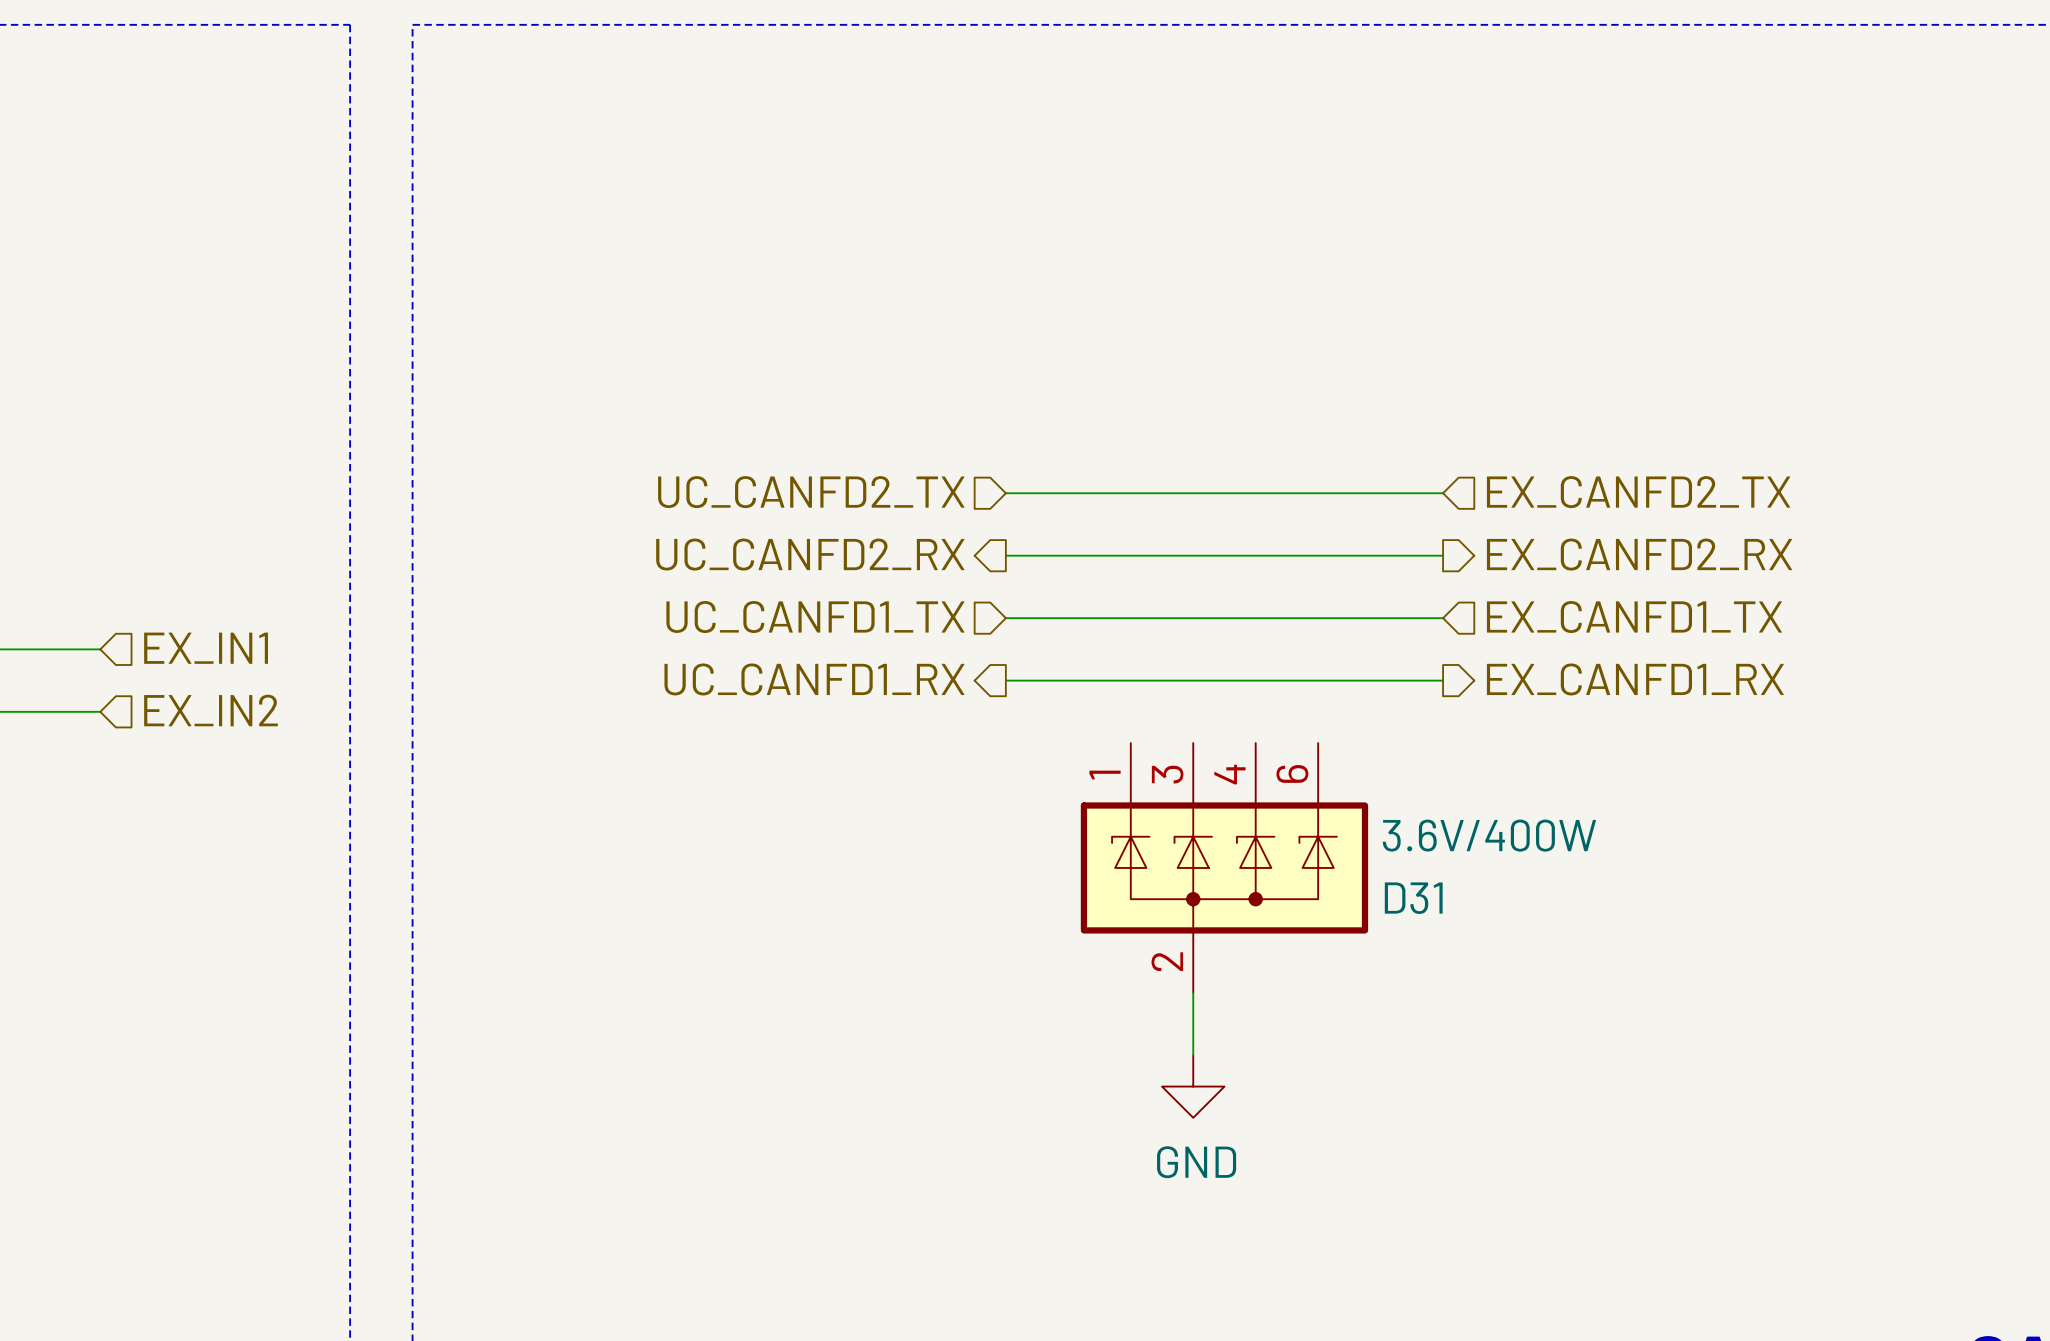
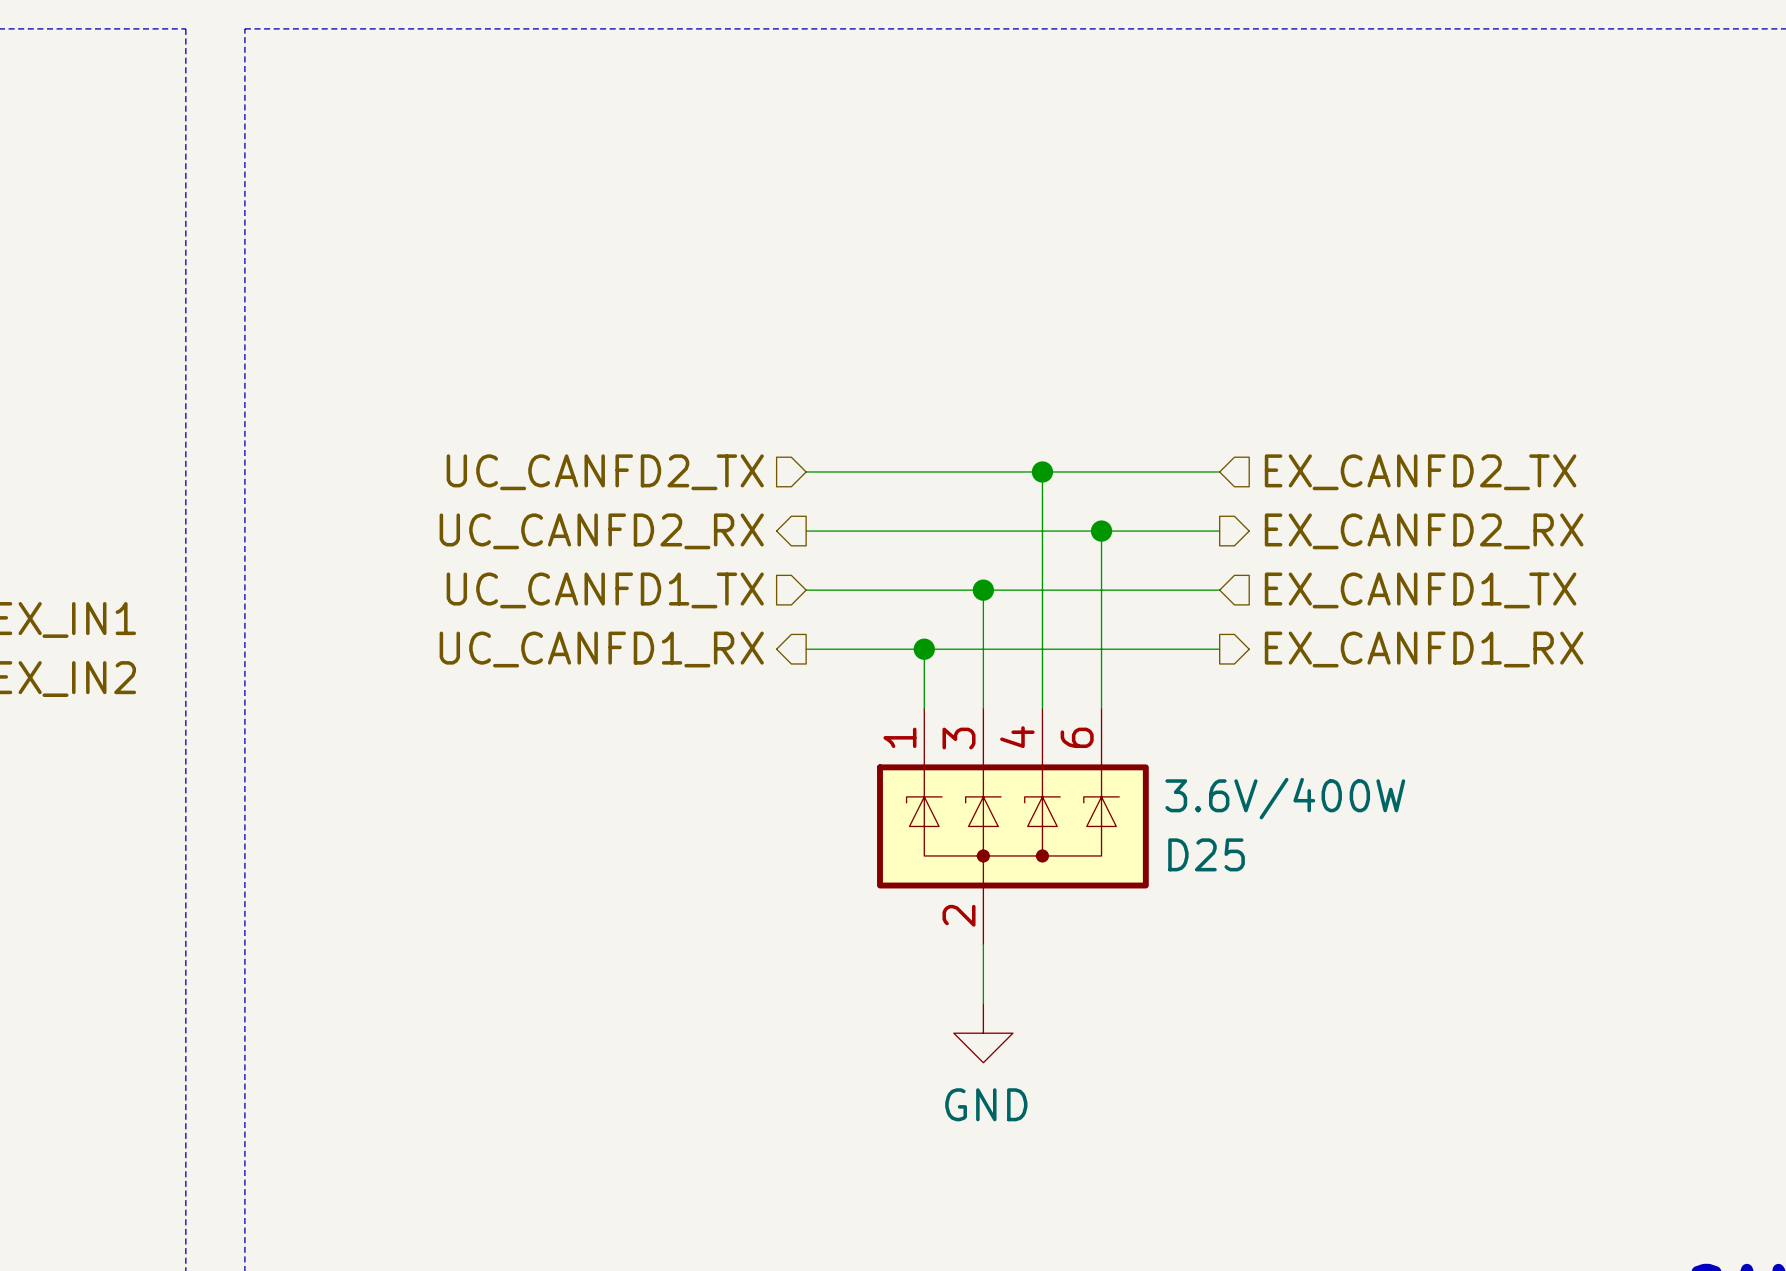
wire: none -> (1042, 471) (1042, 708)
junction: none -> (1042, 471)
wire: none -> (1101, 531) (1101, 708)
junction: none -> (1101, 531)
wire: none -> (983, 590) (983, 708)
junction: none -> (983, 590)
wire: none -> (924, 649) (924, 708)
junction: none -> (924, 649)
D31 name: D31 (1413, 898) -> D25 (1206, 854)

